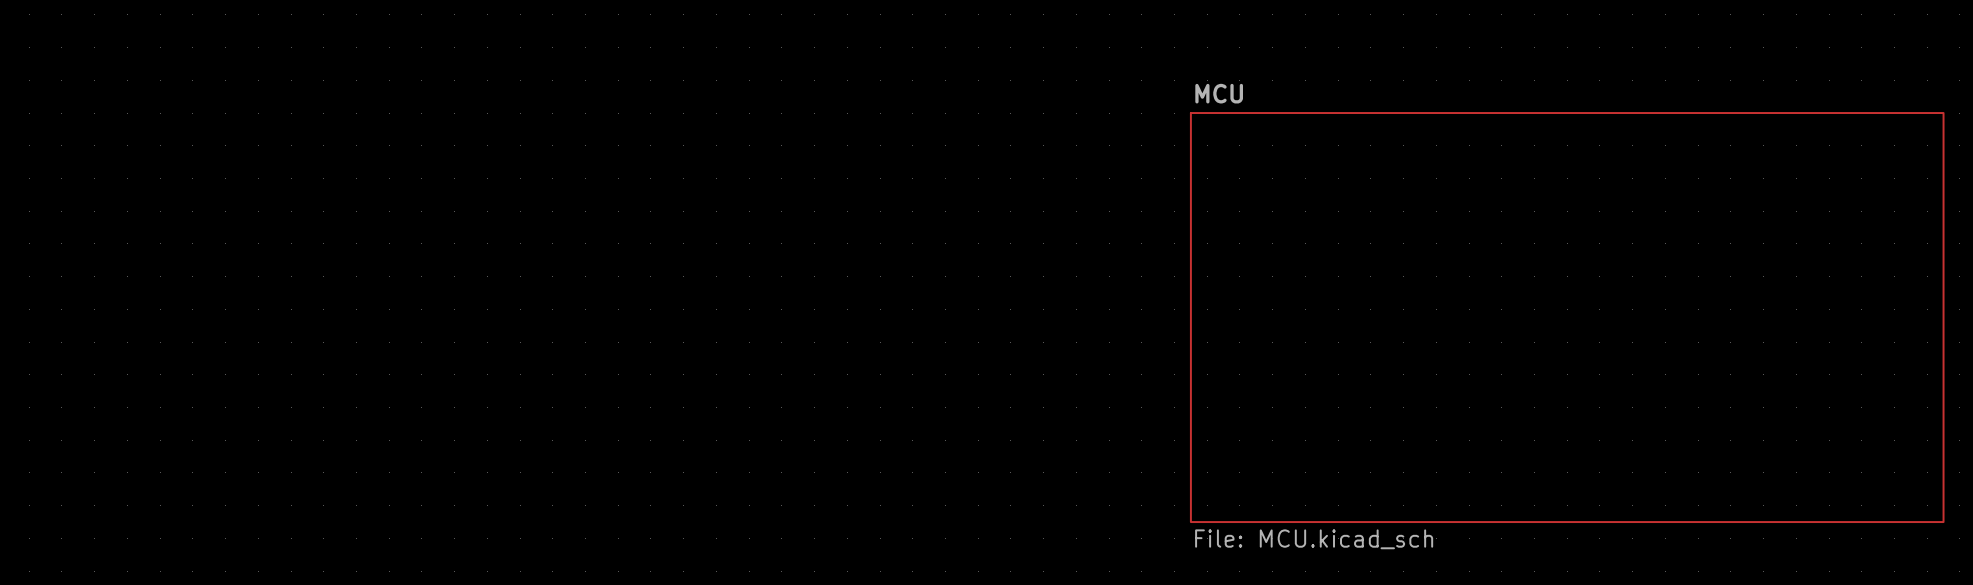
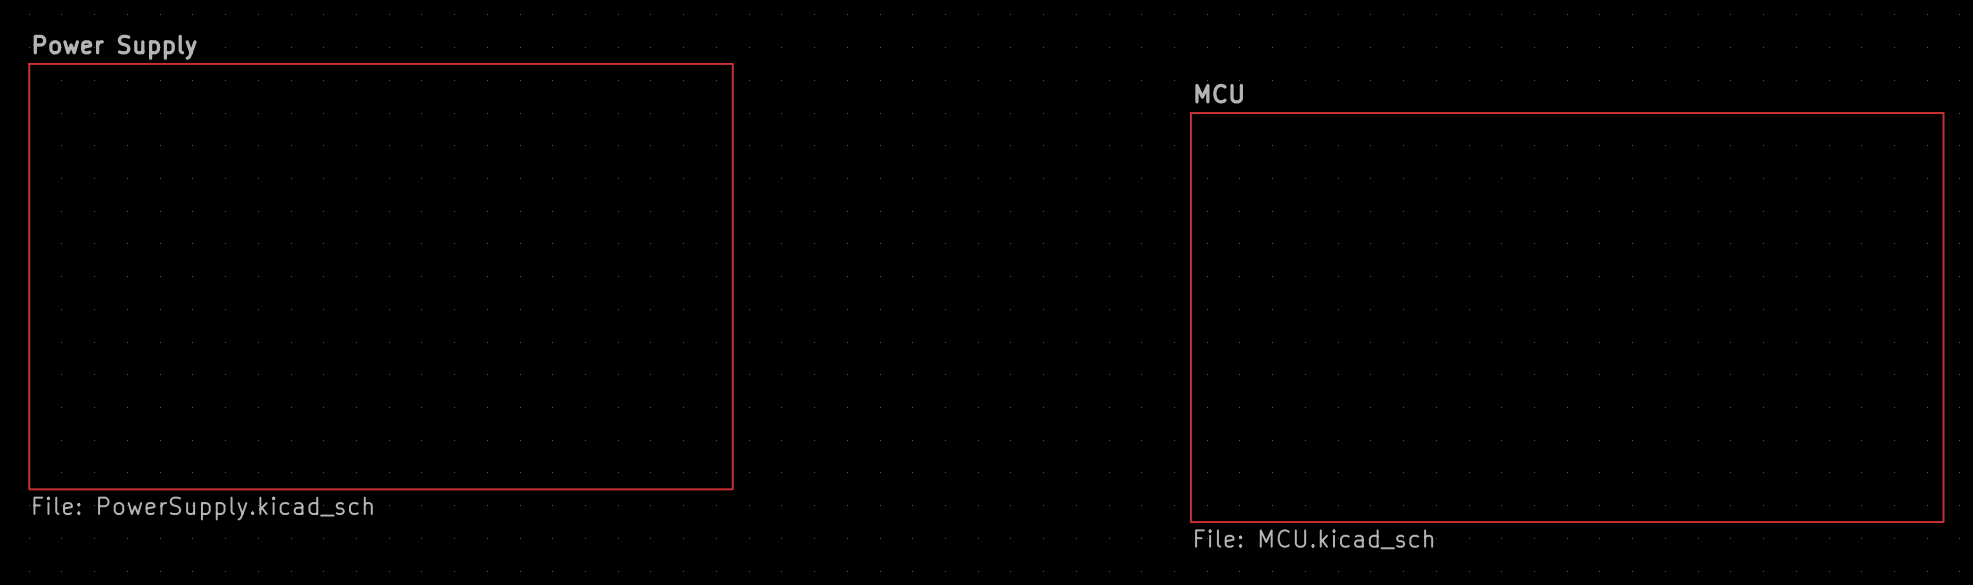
sheet Power Supply: none -> File: PowerSupply.kicad_sch (381, 276)

